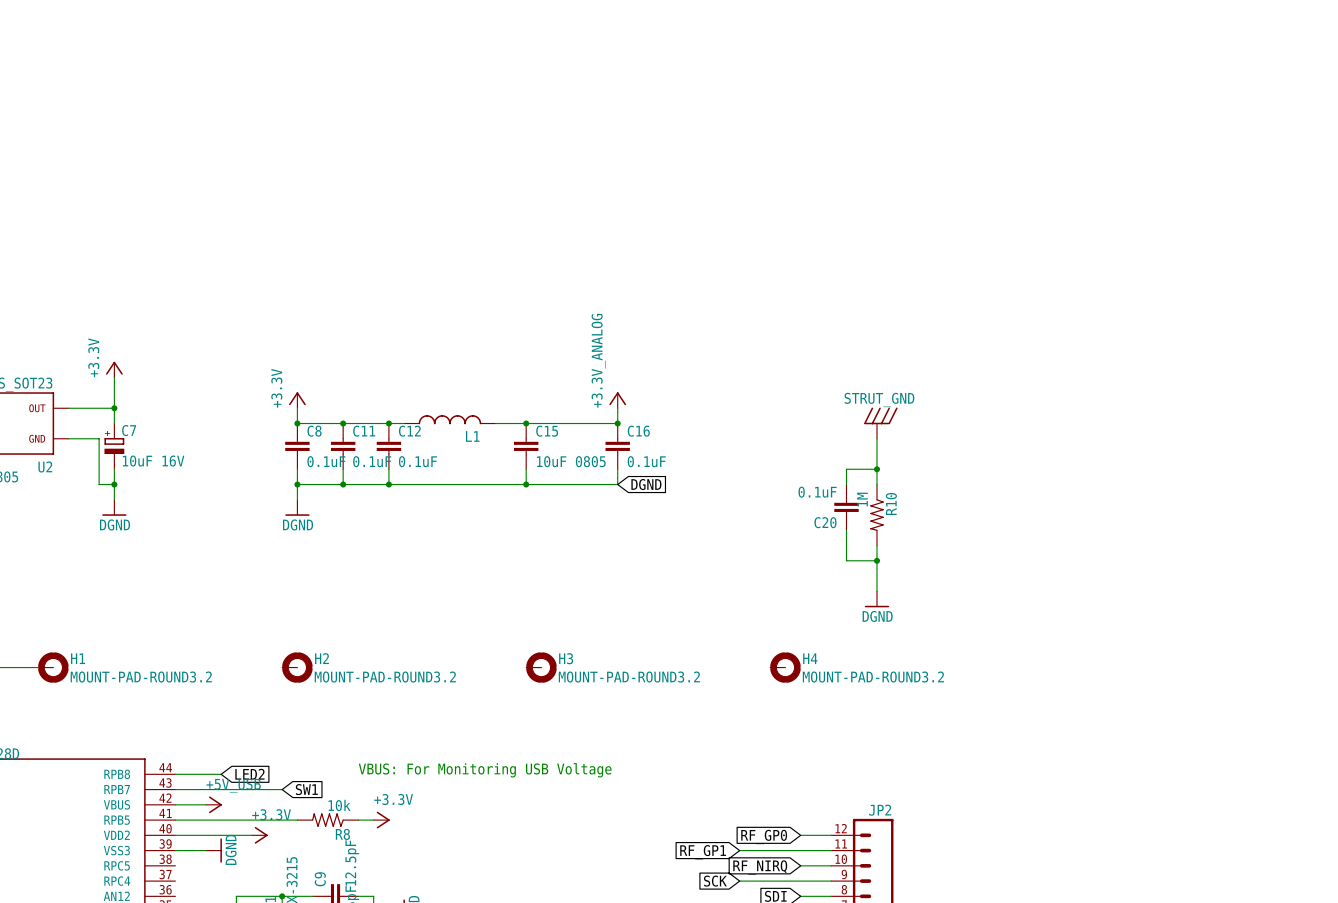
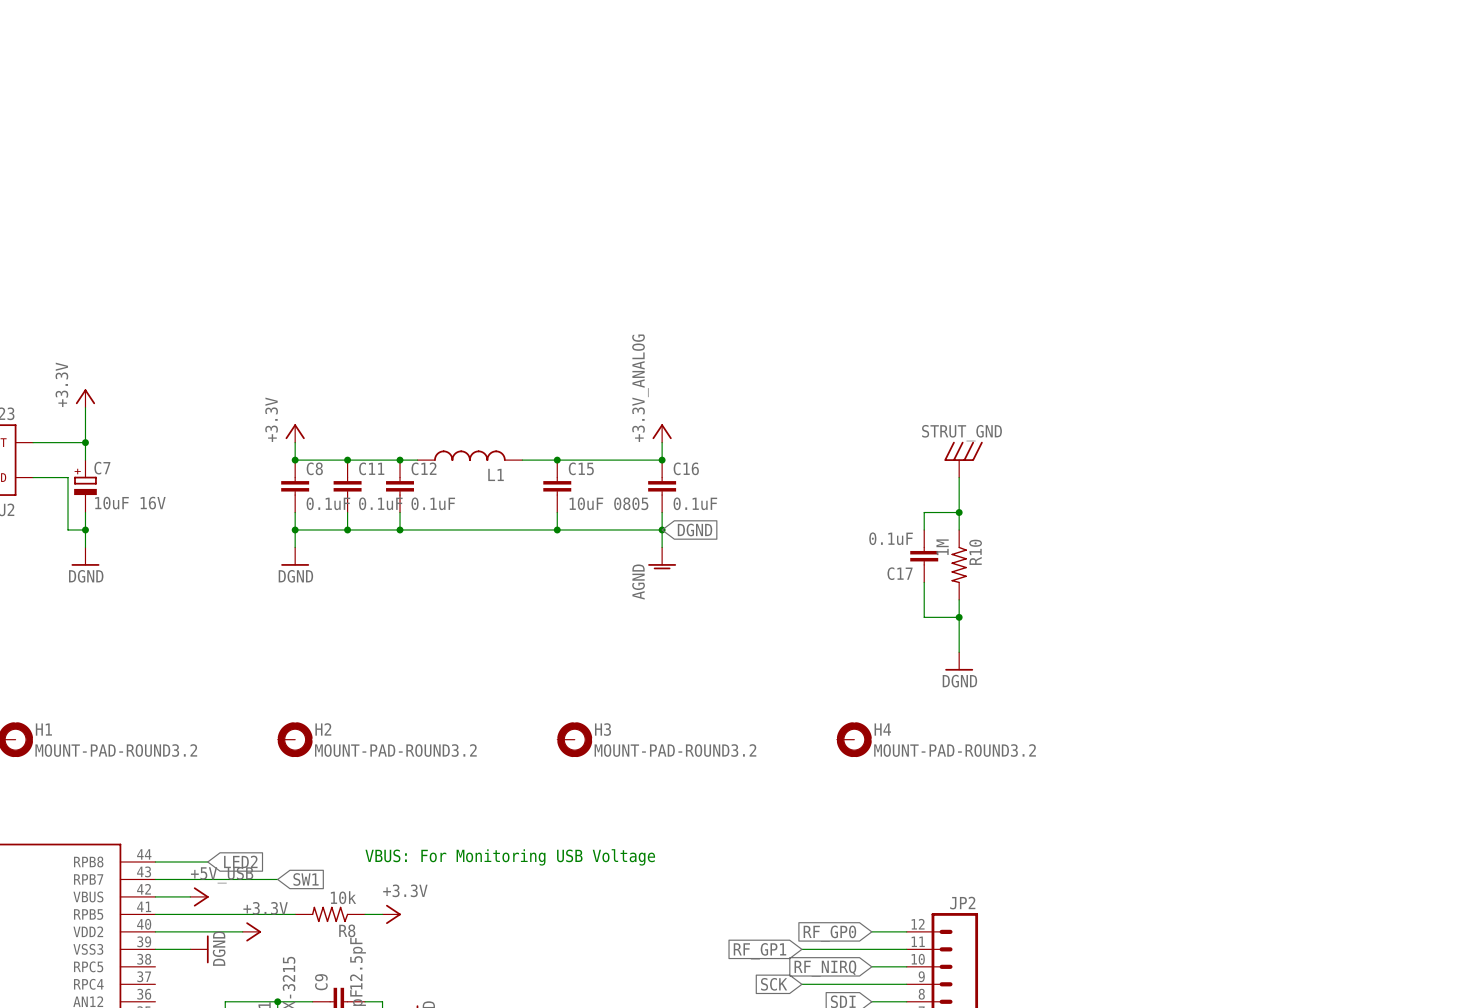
wire: none -> (662, 529) (662, 547)
junction: none -> (662, 529)
power symbol: none -> AGND (662, 558)
C20 name: C20 (825, 522) -> C17 (900, 573)

